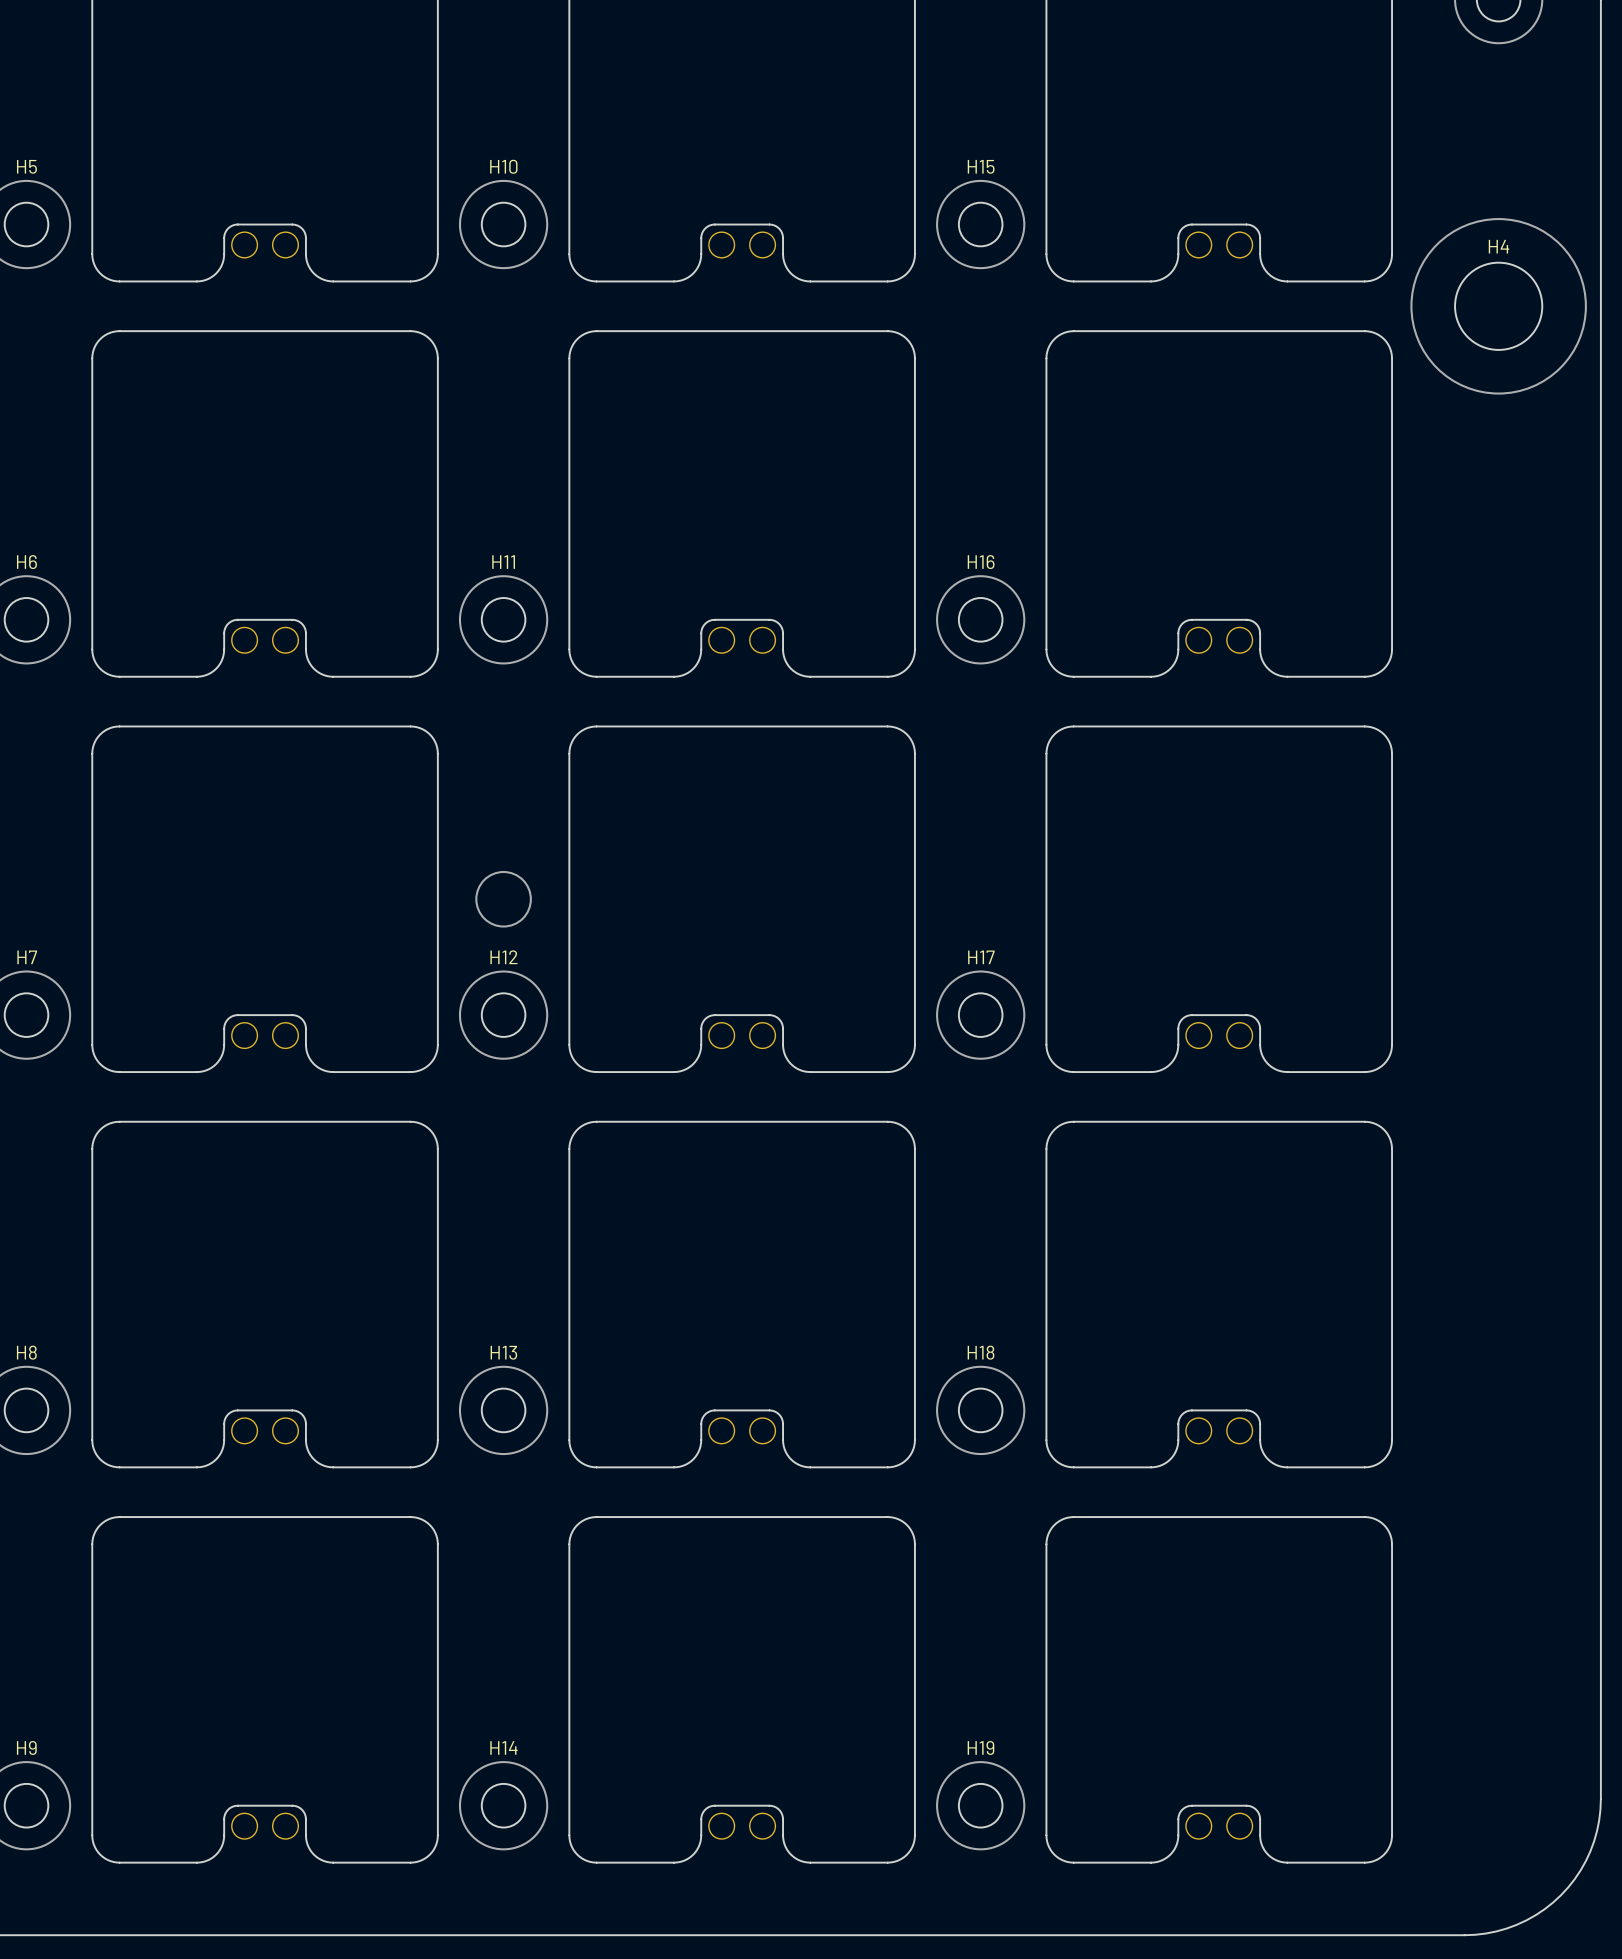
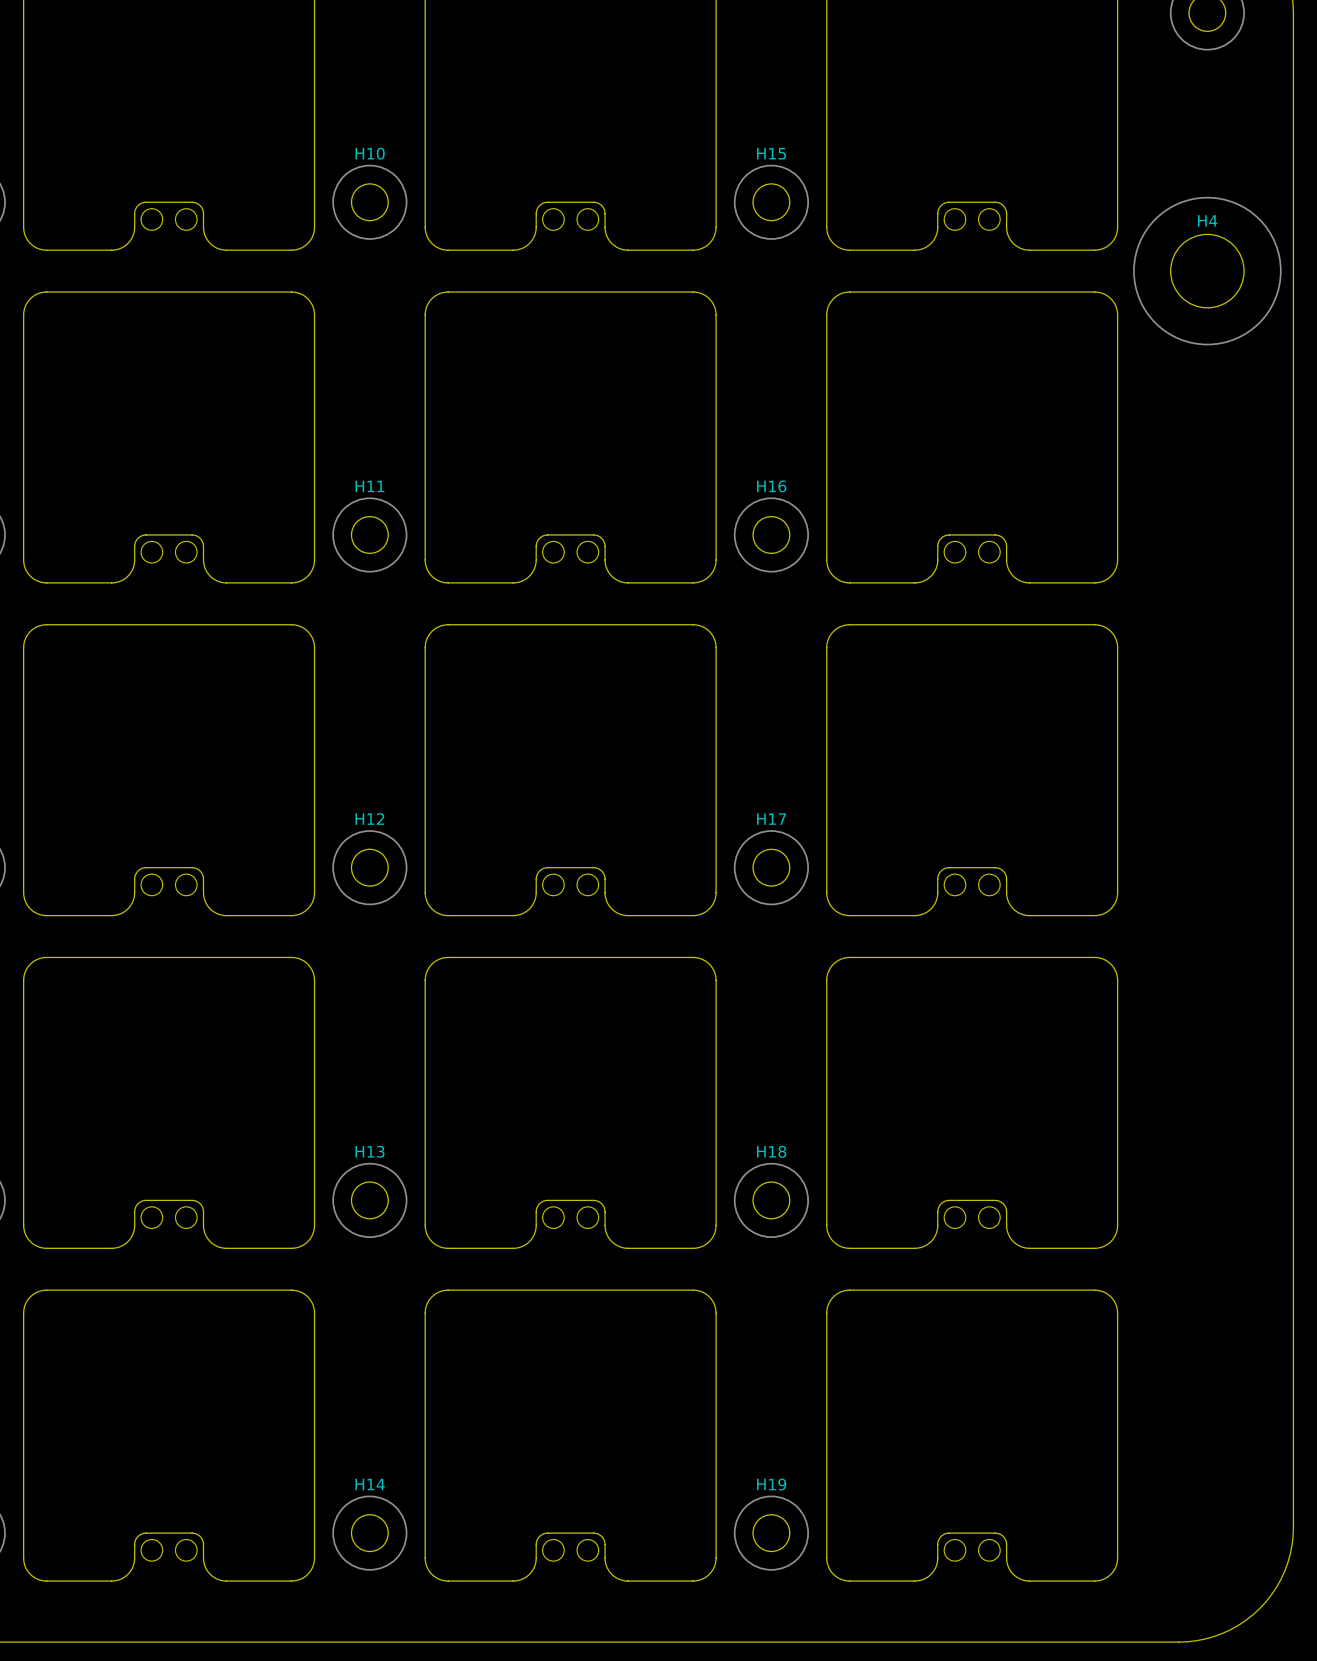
drawing: [475, 870, 532, 928] -> none

